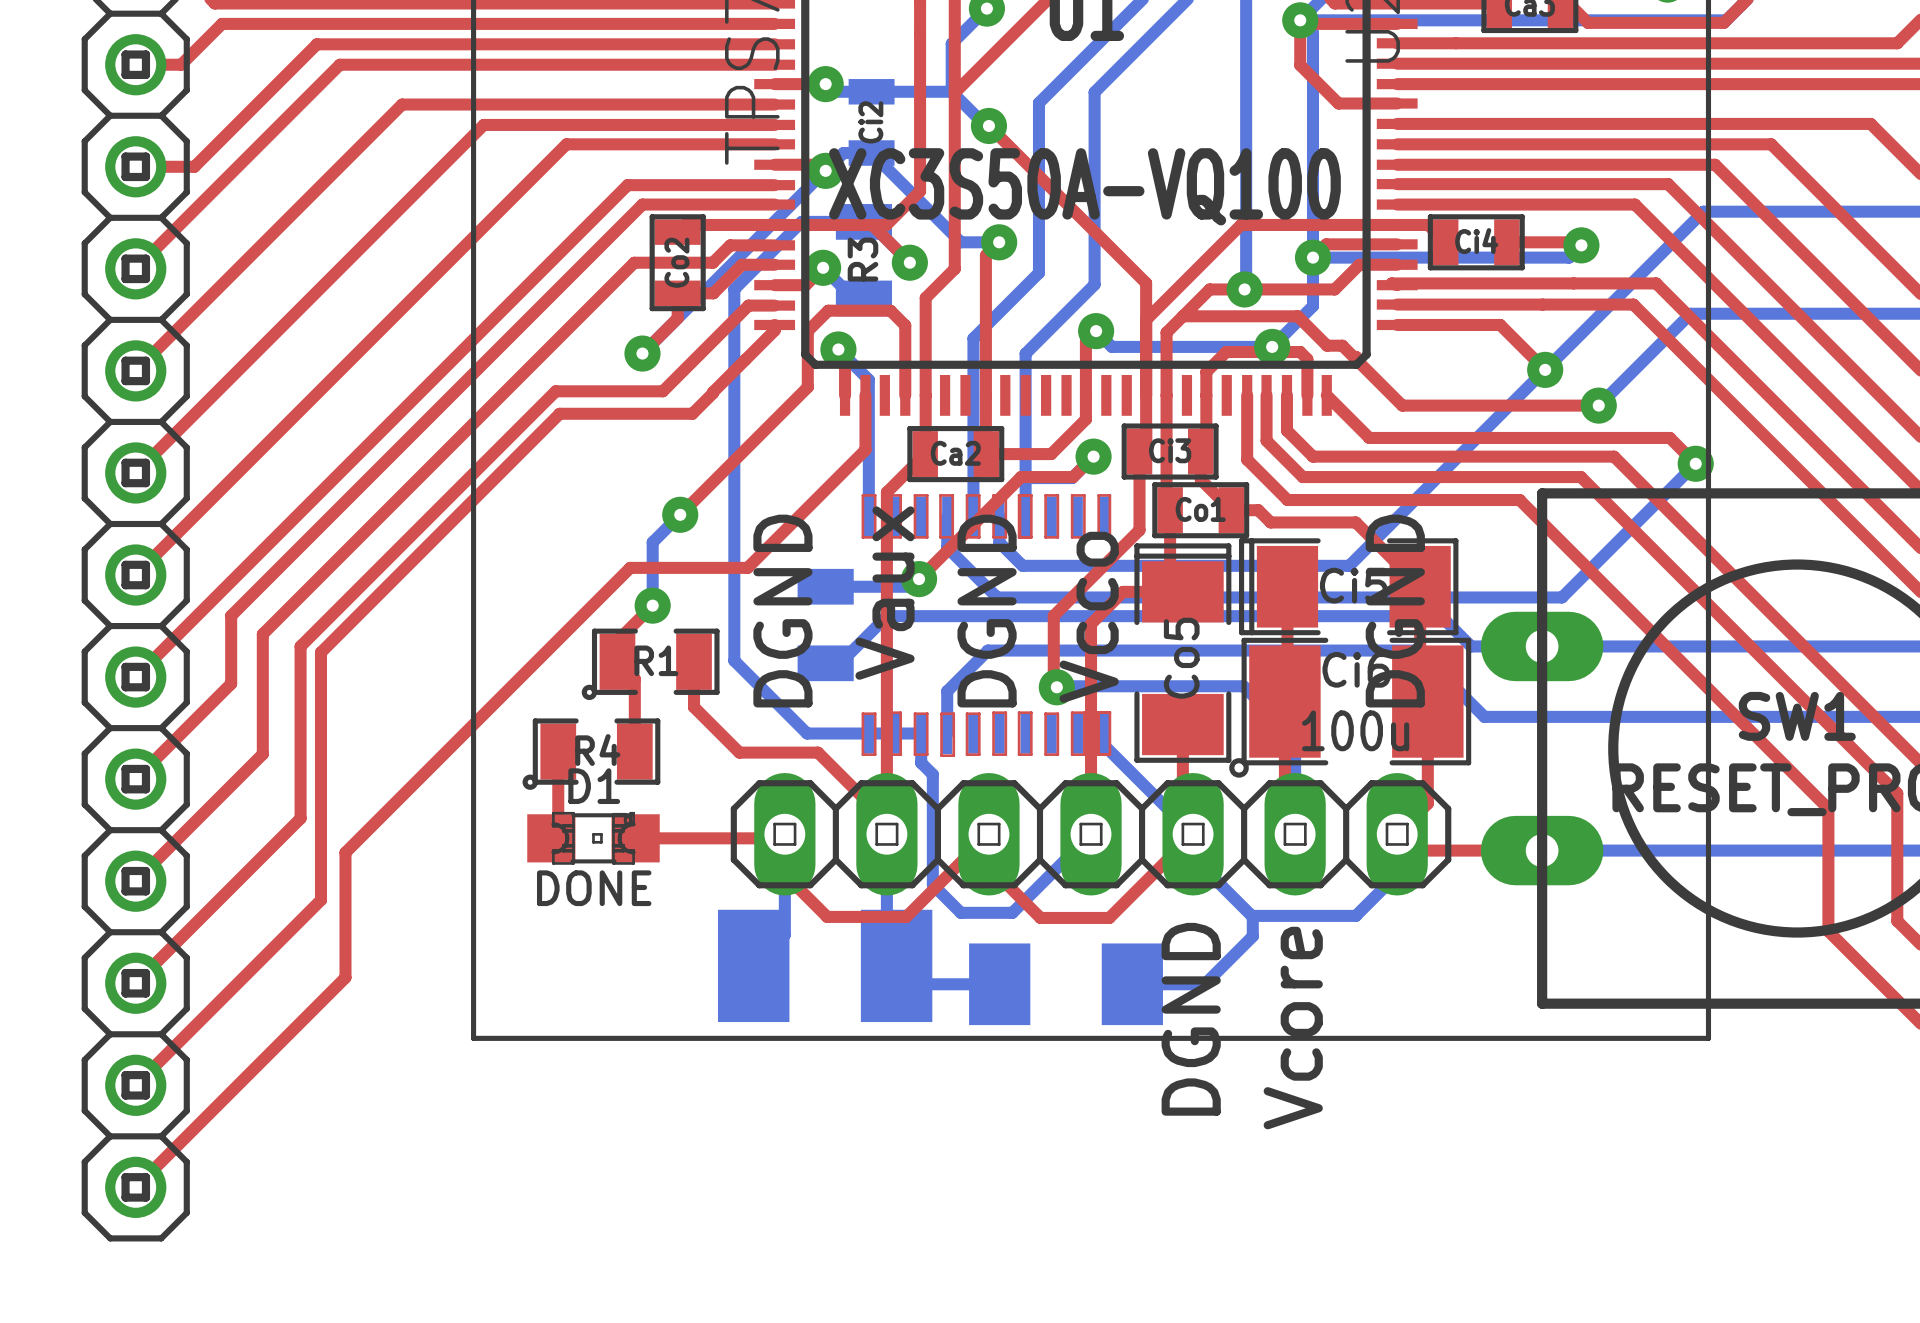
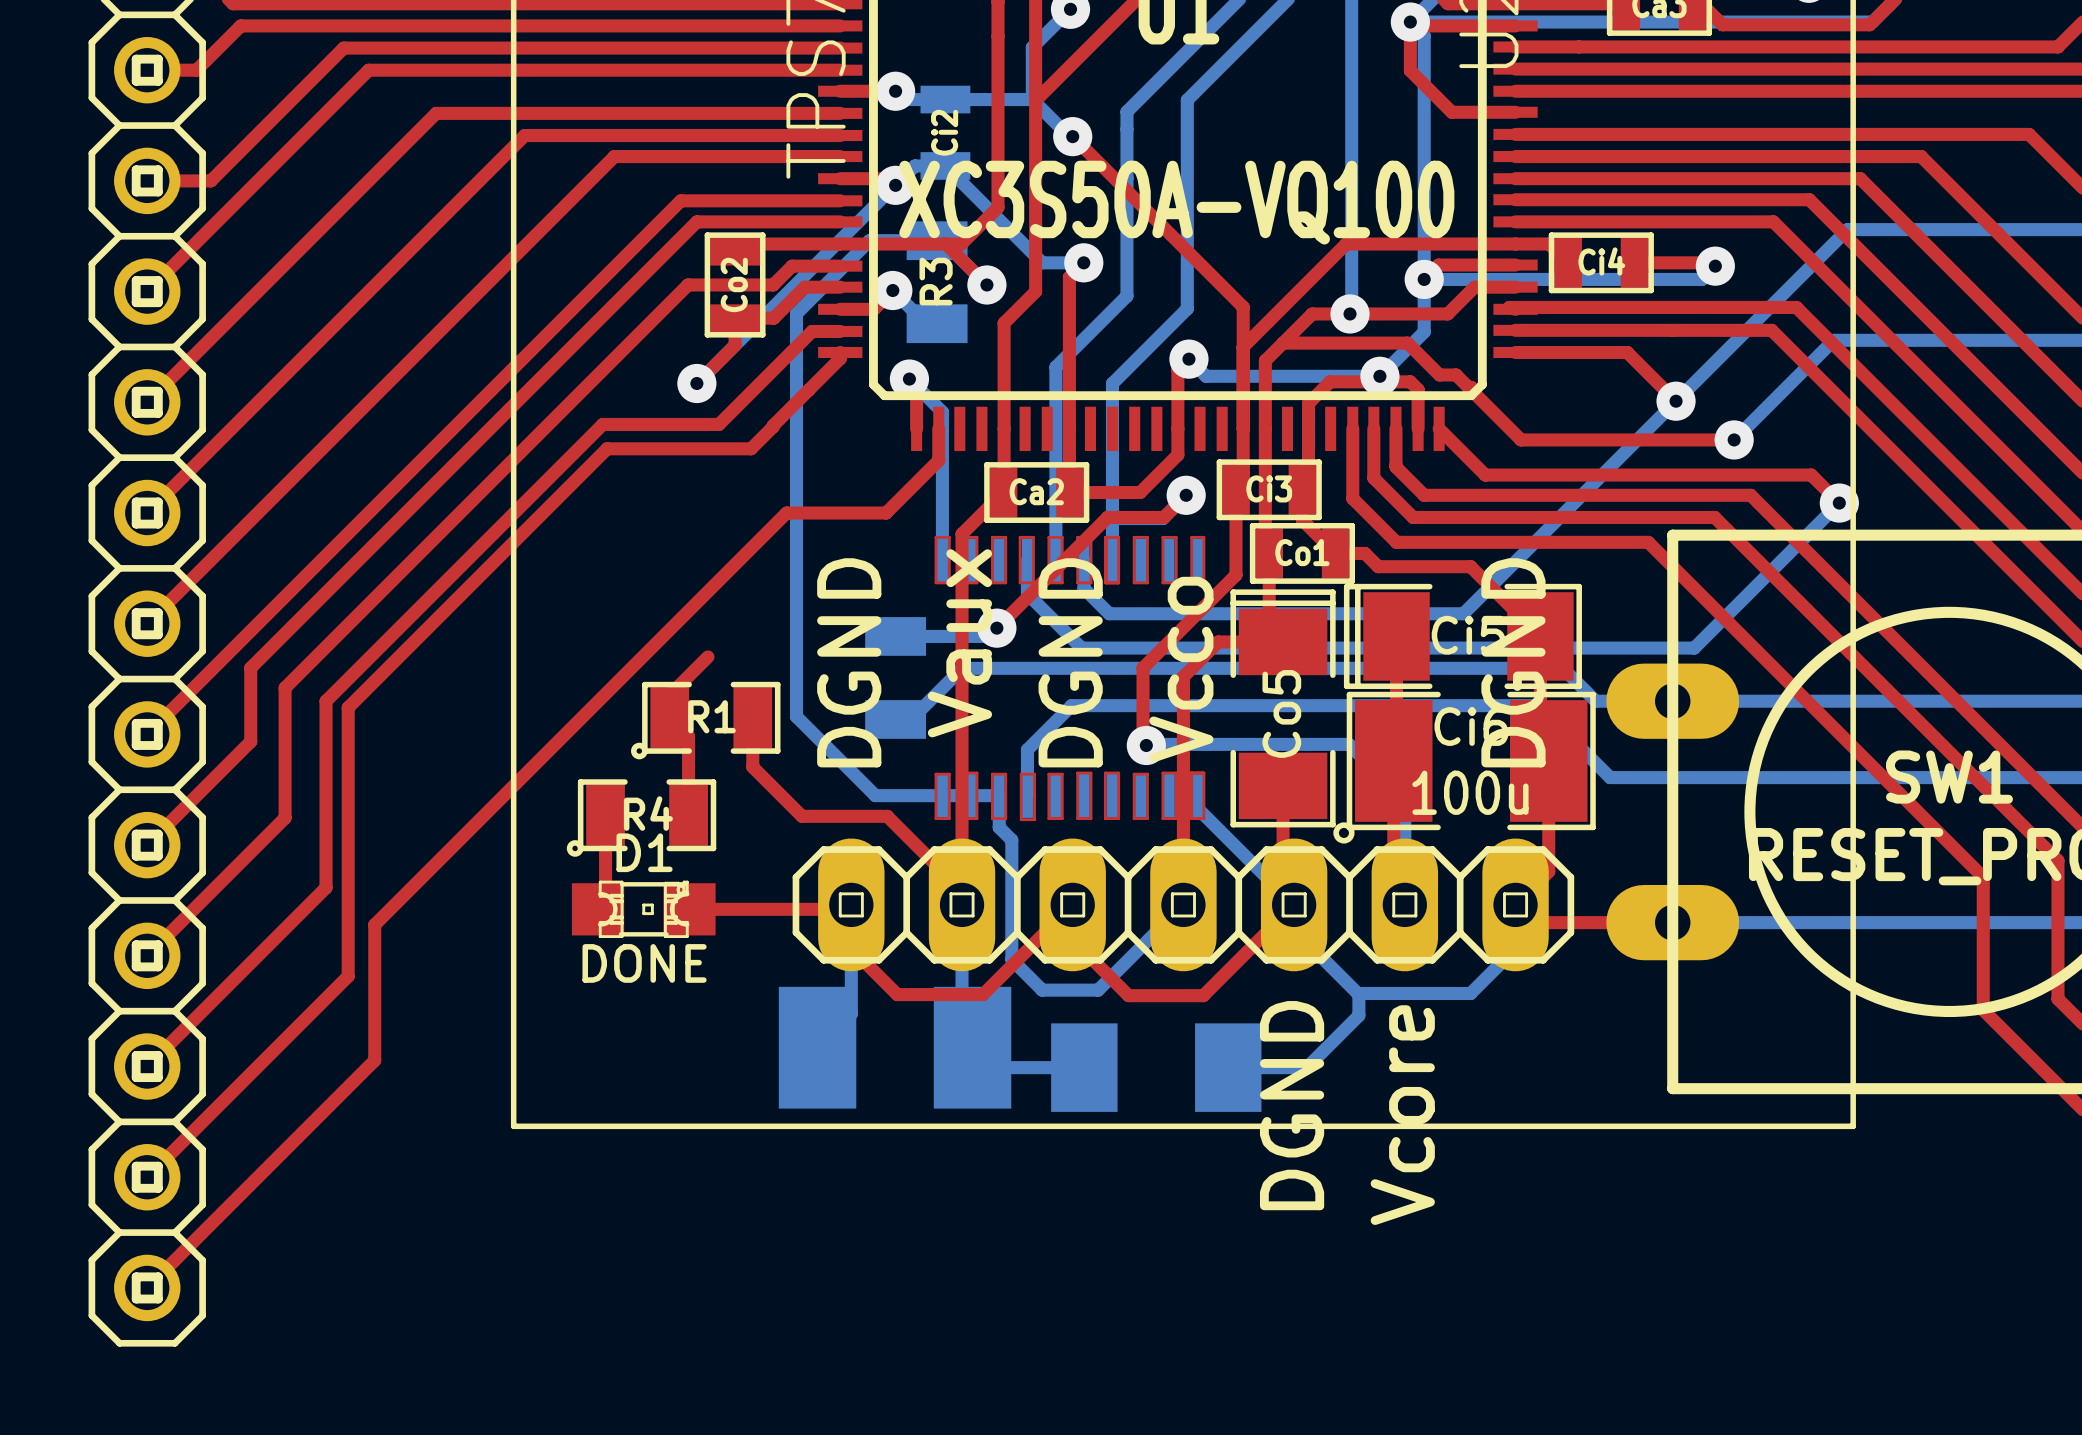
top track: (905, 395) (905, 325) (890, 310) (828, 310) (807, 331) (807, 387) (680, 514) -> none
top track: (865, 424) (865, 450) (747, 567) (630, 567) -> (938, 460) (886, 513) (786, 513) (683, 615)
bottom track: (680, 514) (652, 542) (652, 605) -> none
via: (680, 514) -> none
via: (652, 605) -> none

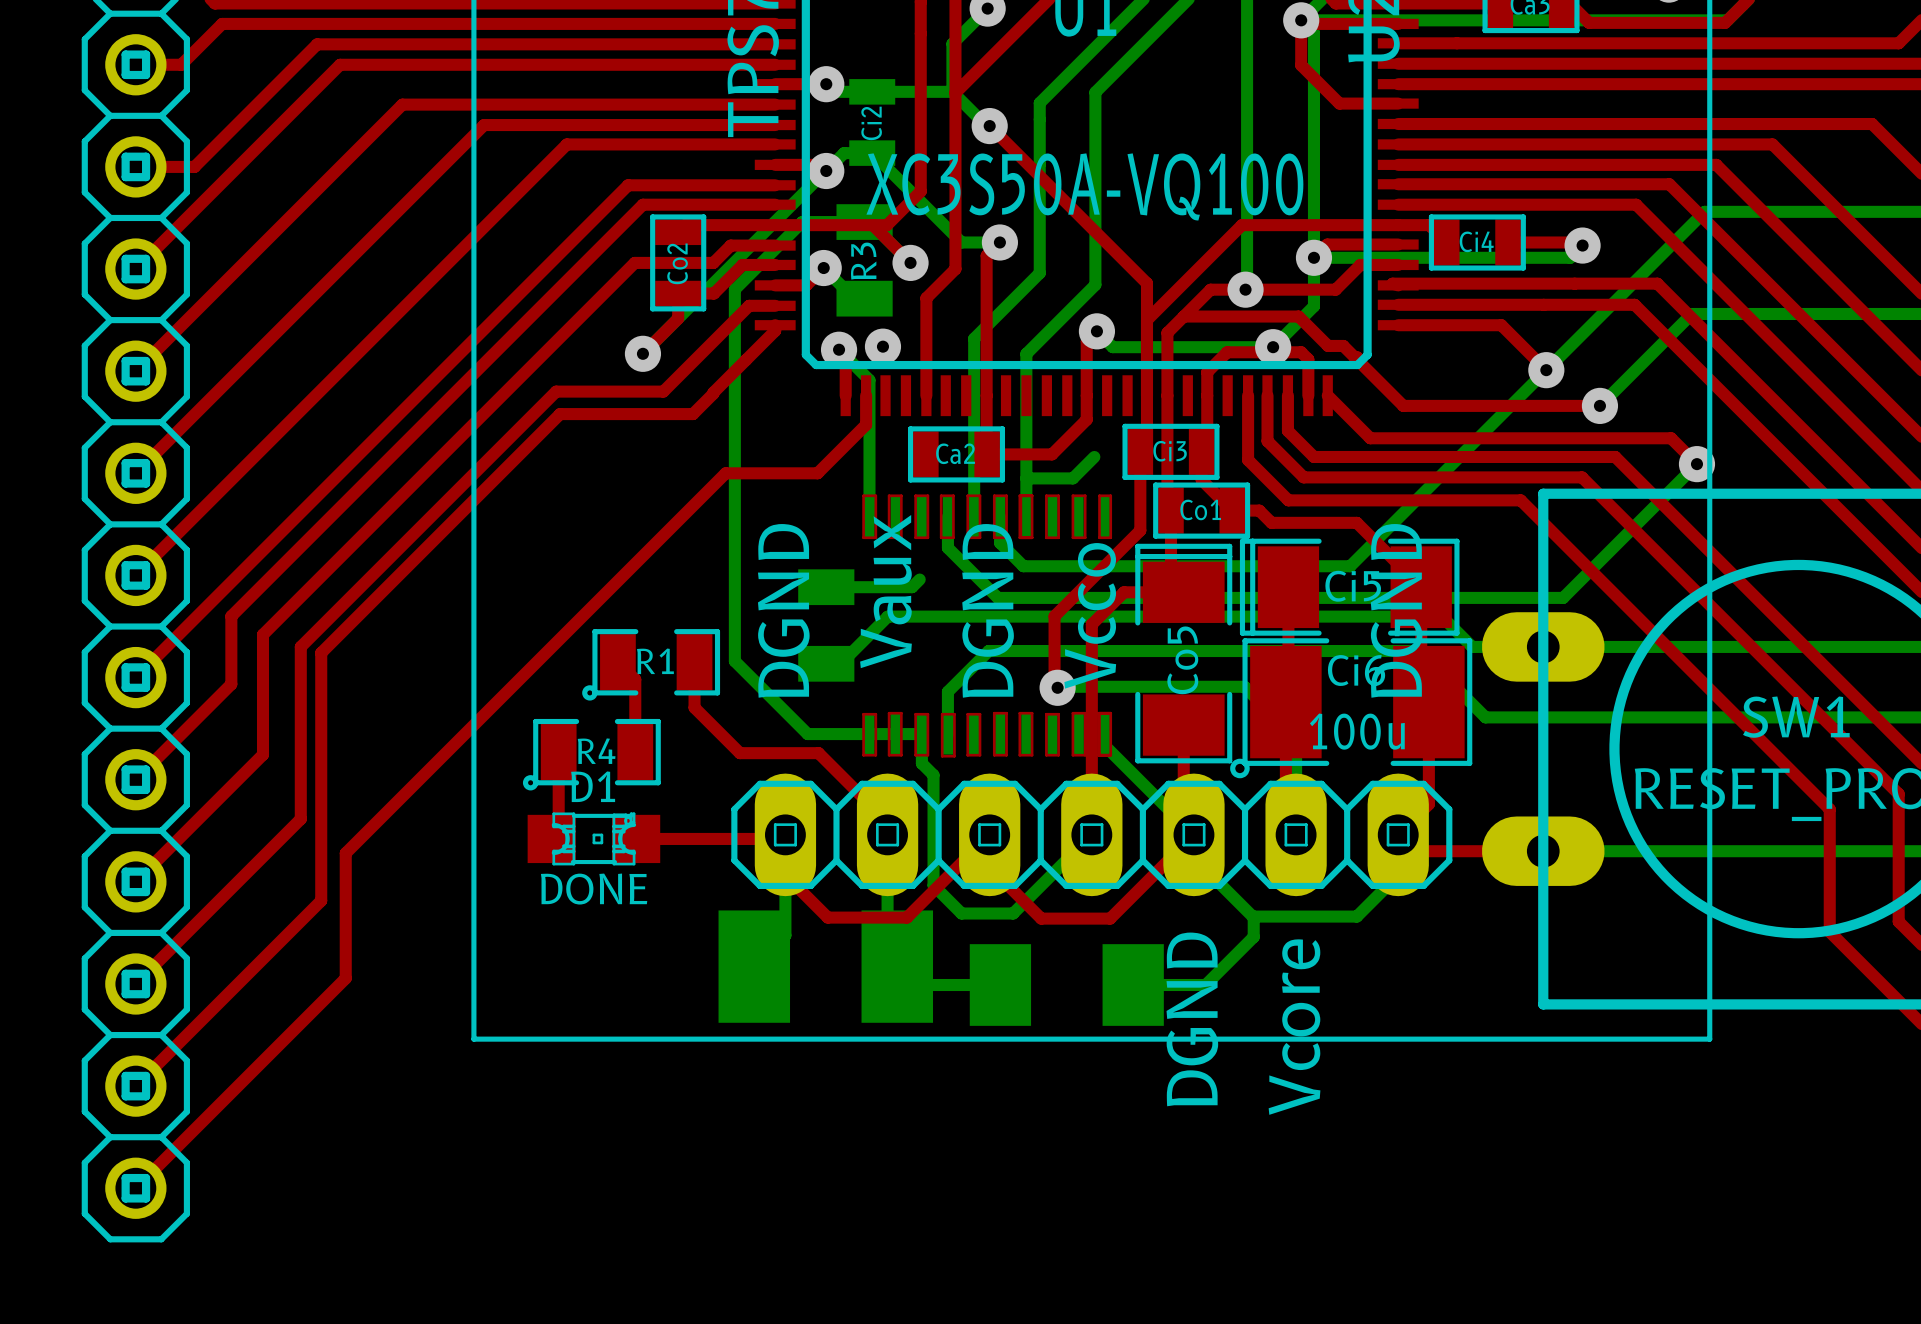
via: none -> (882, 346)
top track: (1004, 428) (1004, 491) (962, 534) (962, 891) -> none
top track: (1186, 495) (1164, 517) (1107, 517) (996, 628) -> none
via: (1186, 495) -> none
via: (996, 628) -> none
top track: (707, 656) (669, 695) (669, 717) -> none

